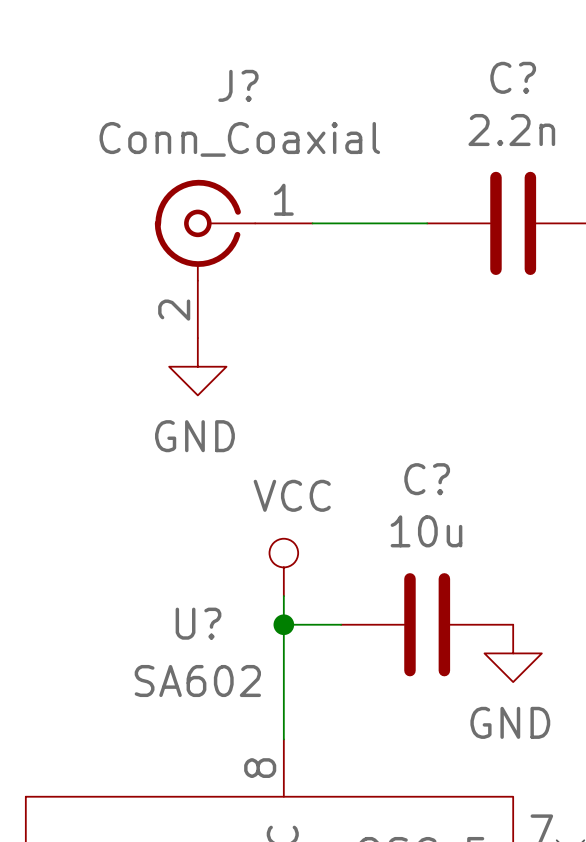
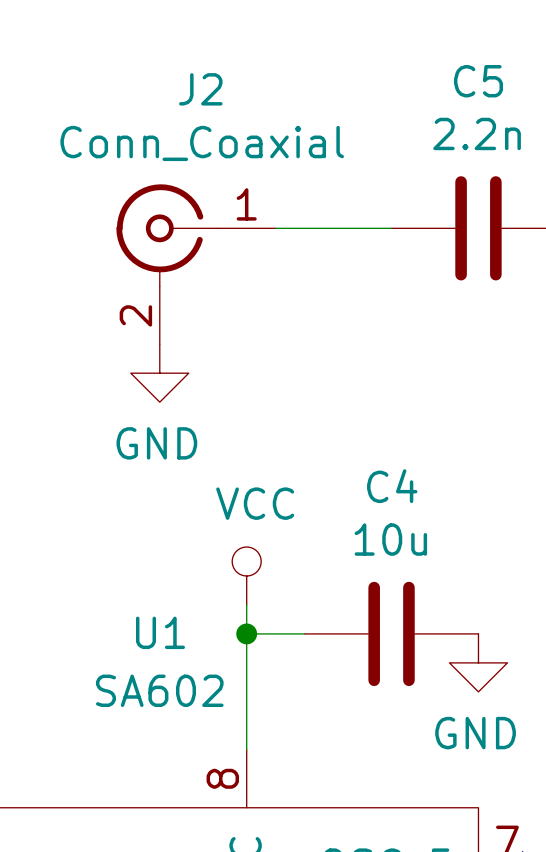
C? name: C? (513, 77) -> C5 (478, 81)
J? name: J? (238, 85) -> J2 (200, 89)
C? name: C? (427, 479) -> C4 (392, 486)
U? name: U? (198, 623) -> U1 (160, 632)

